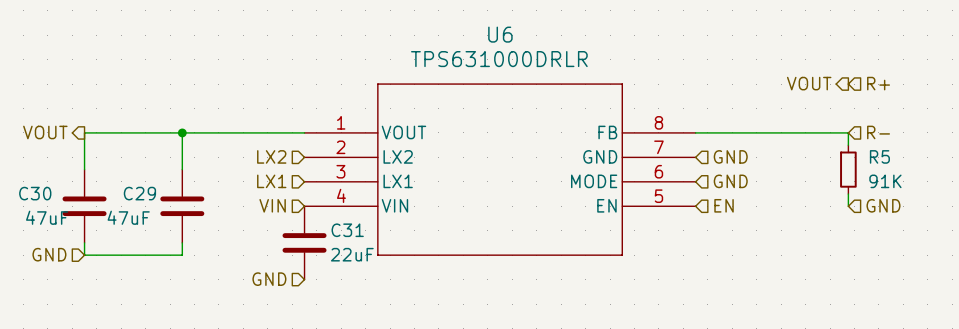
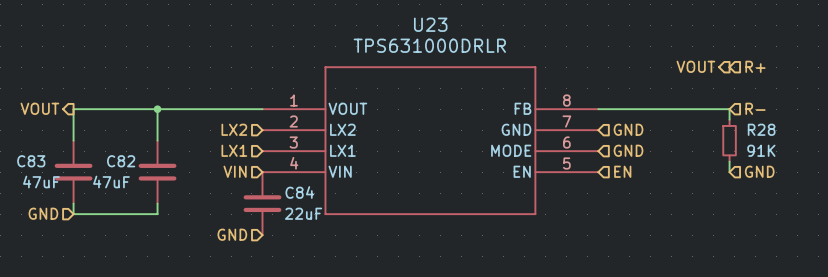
U6 name: U6 (500, 34) -> U23 (430, 24)
R5 name: R5 (879, 156) -> R28 (761, 129)
C30 name: C30 (35, 193) -> C83 (31, 161)
C29 name: C29 (139, 193) -> C82 (121, 161)
C31 name: C31 (347, 230) -> C84 (299, 192)

